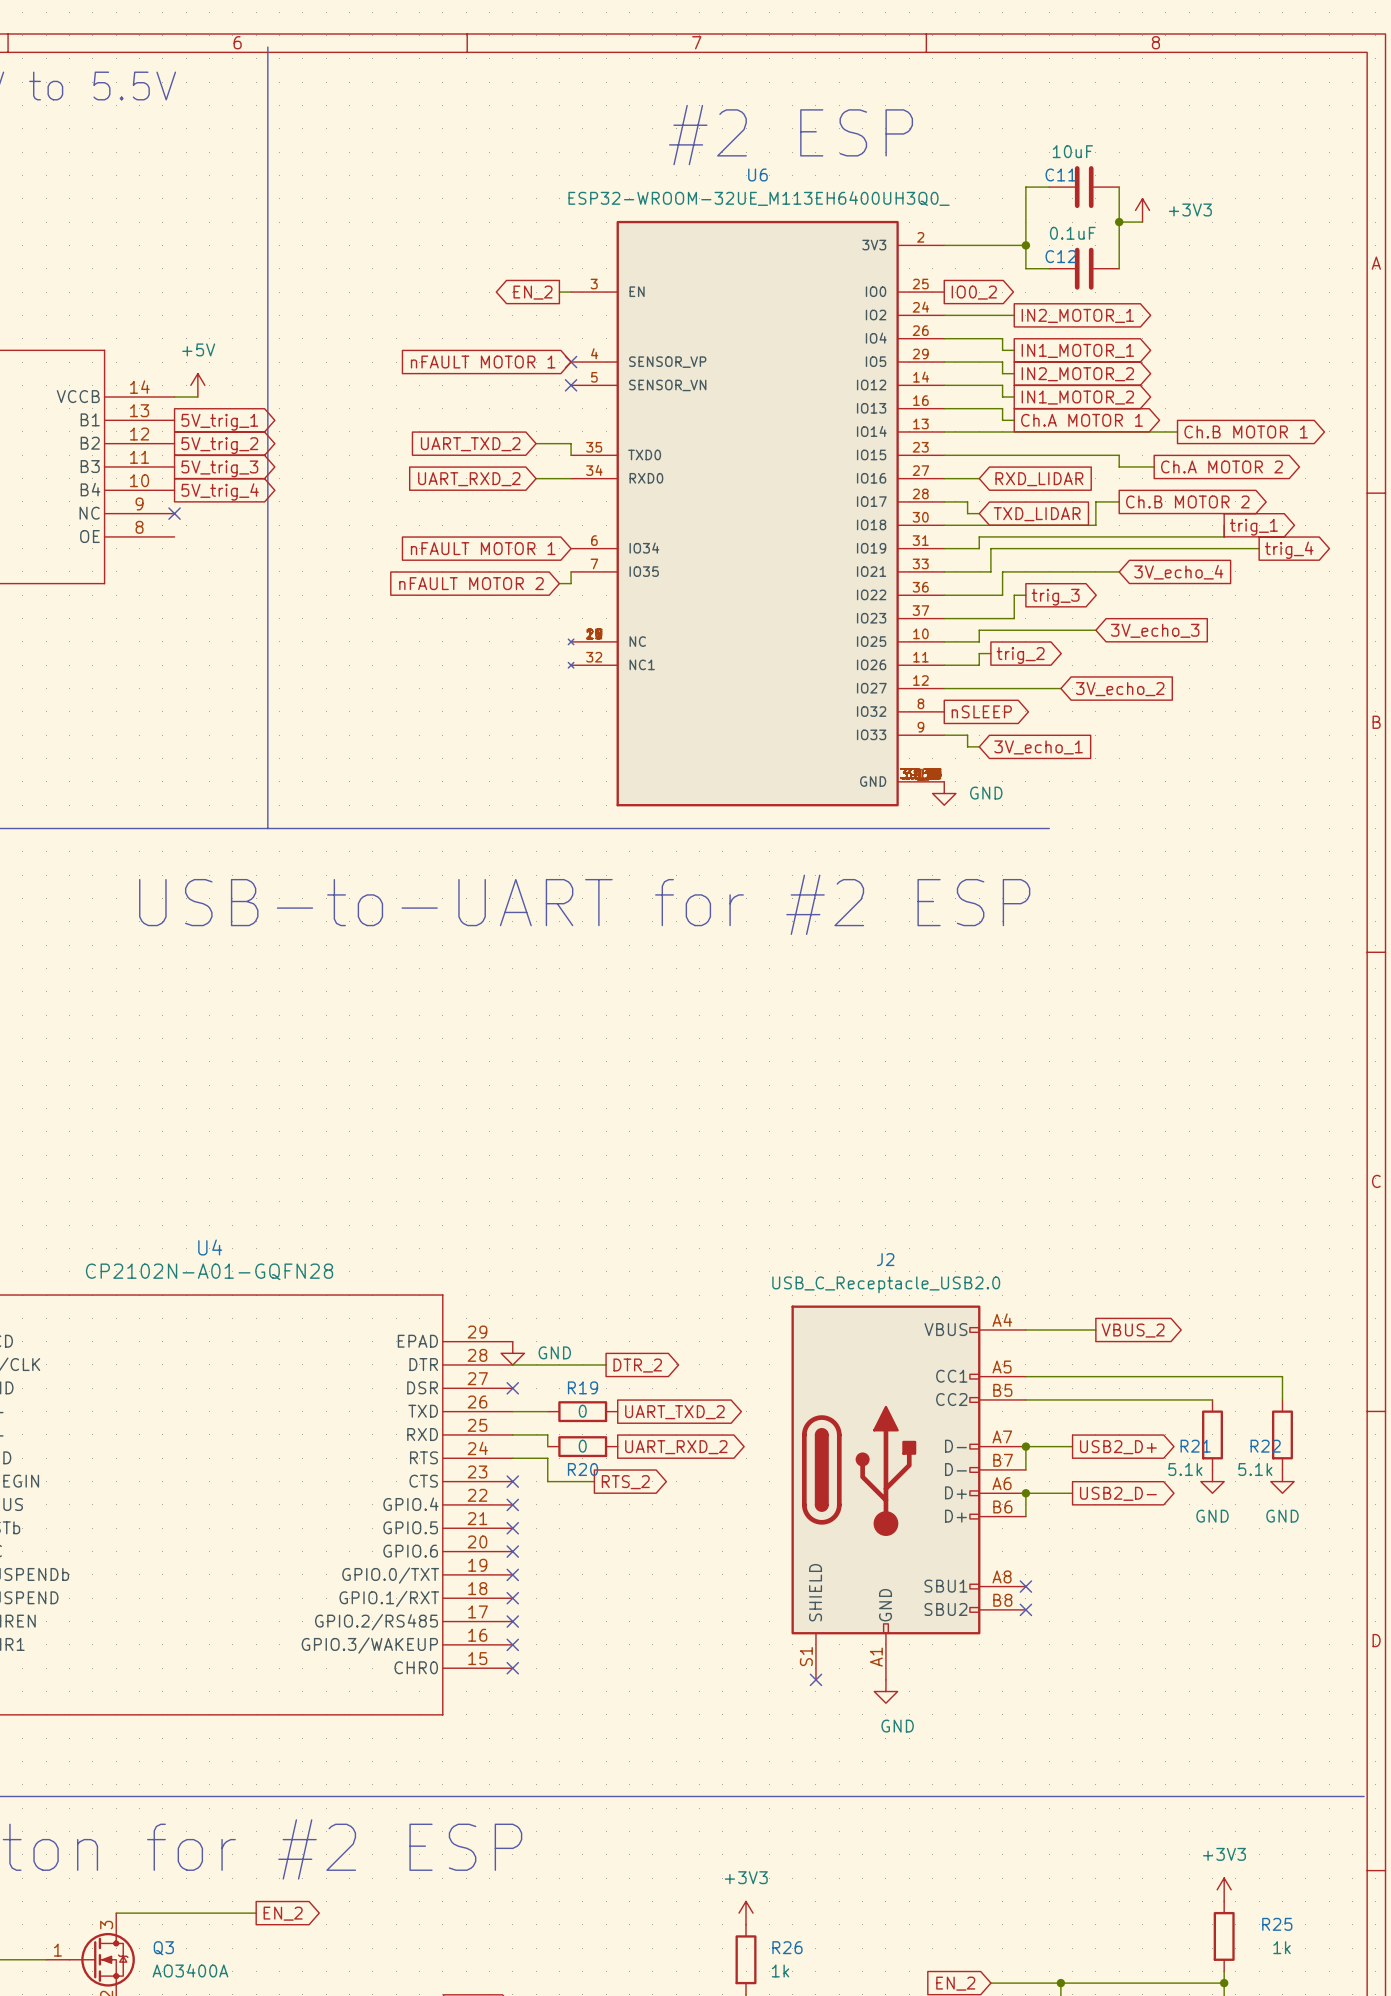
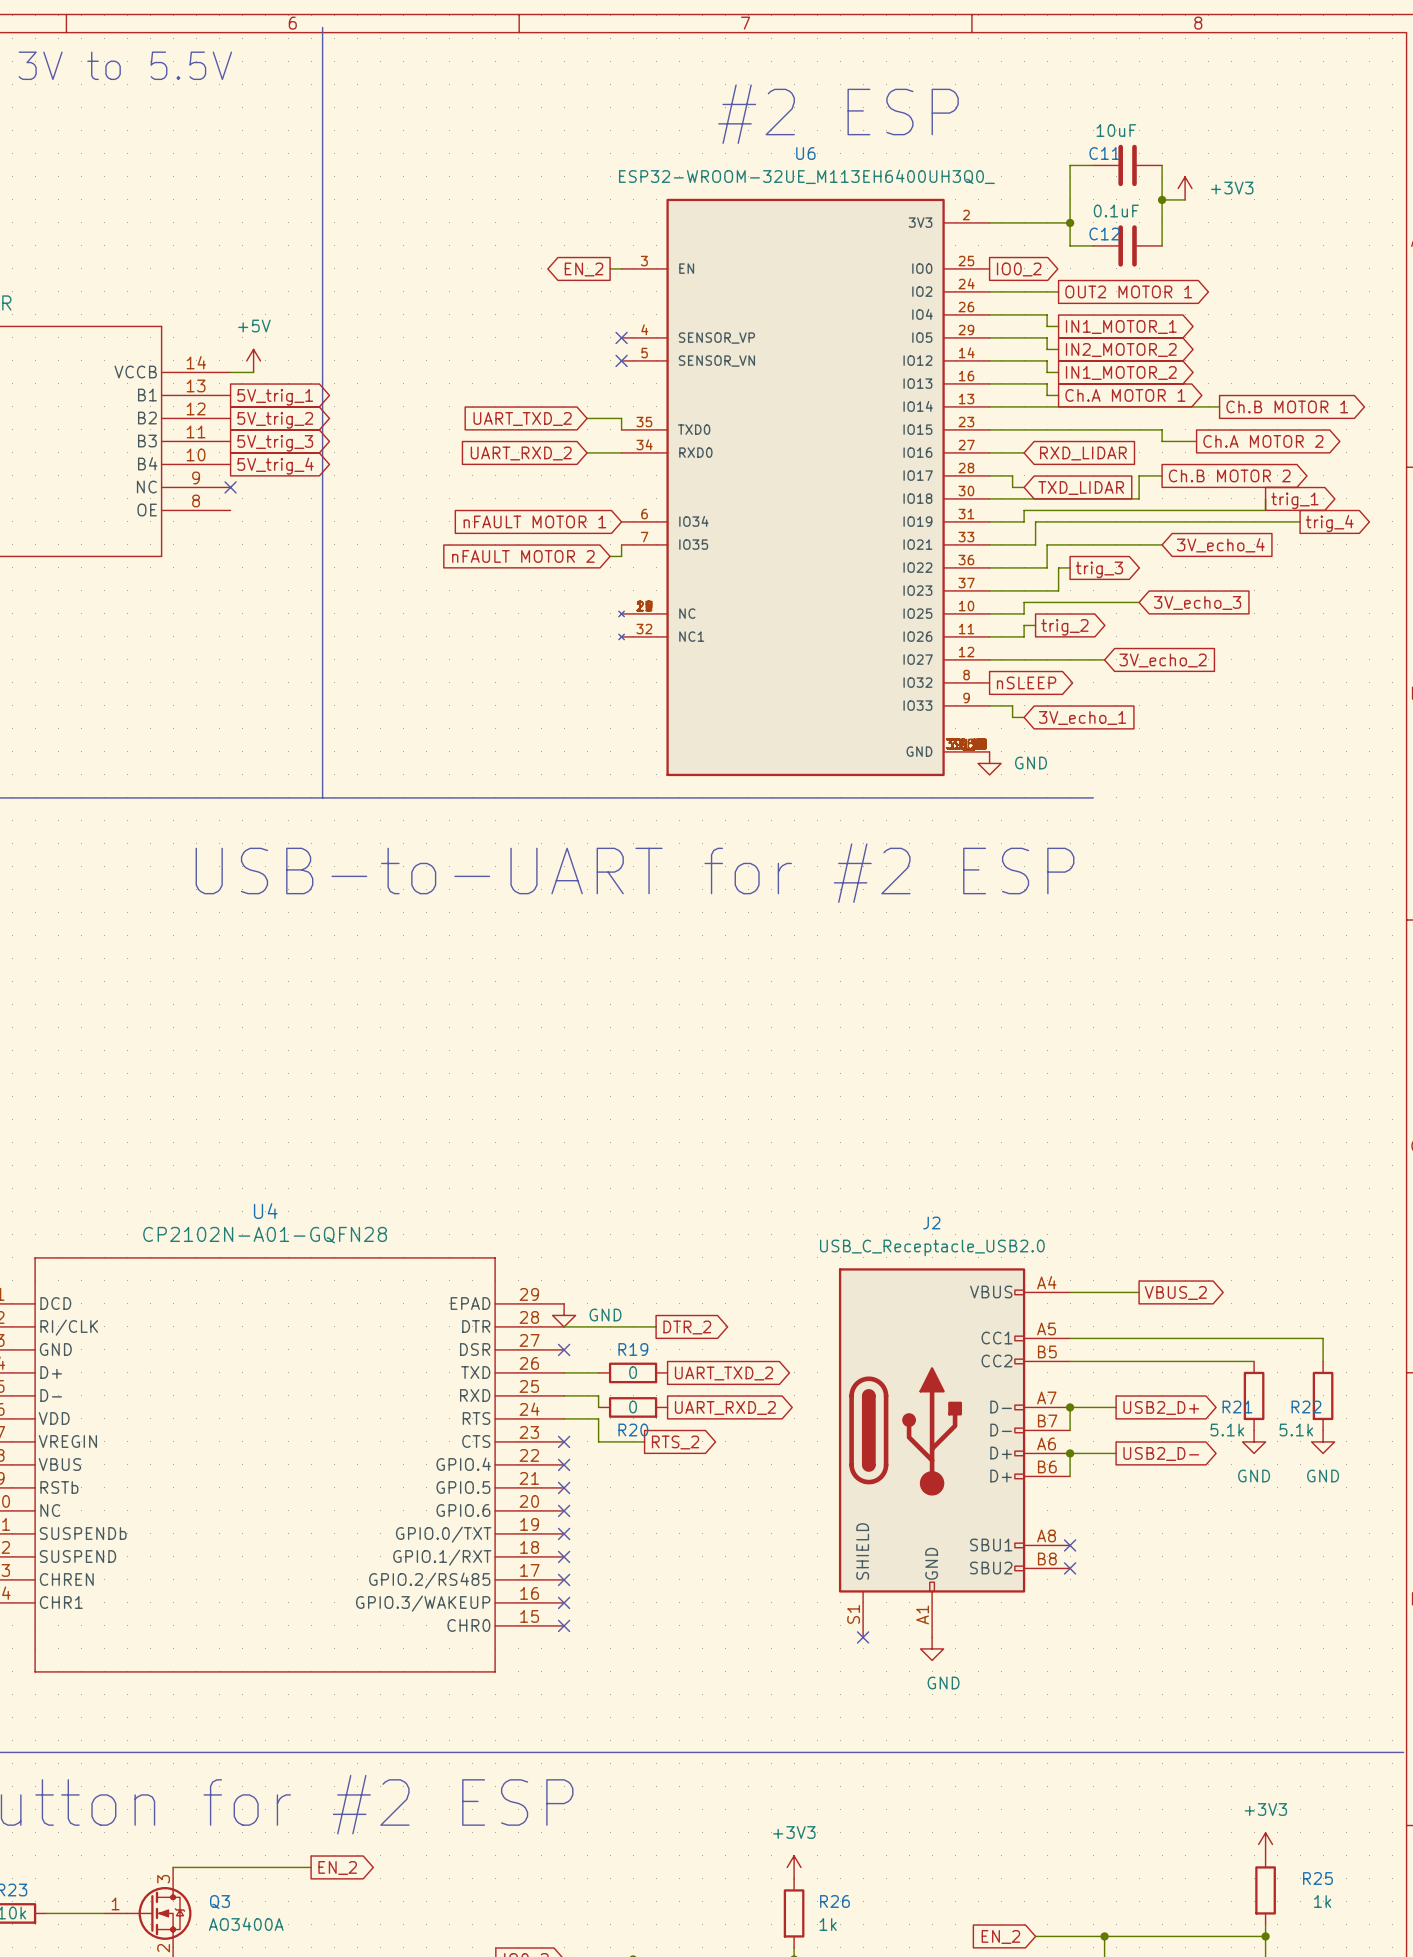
global label: IN2_MOTOR_1 (1077, 315) -> OUT2 MOTOR 1 (1128, 291)
global label: nFAULT MOTOR 1 (483, 362) -> none

